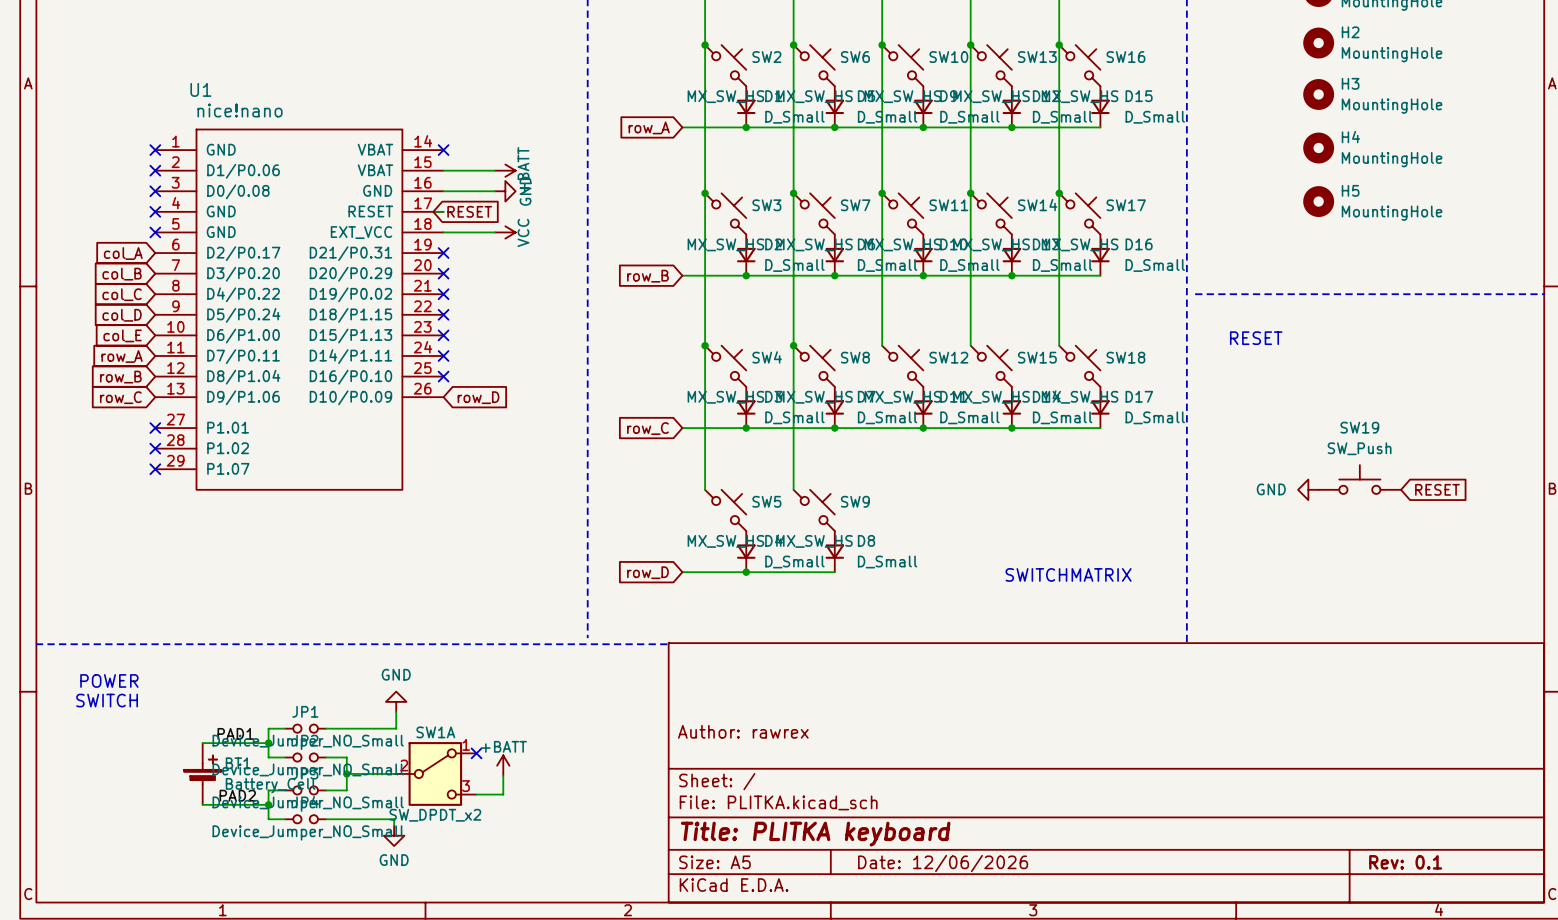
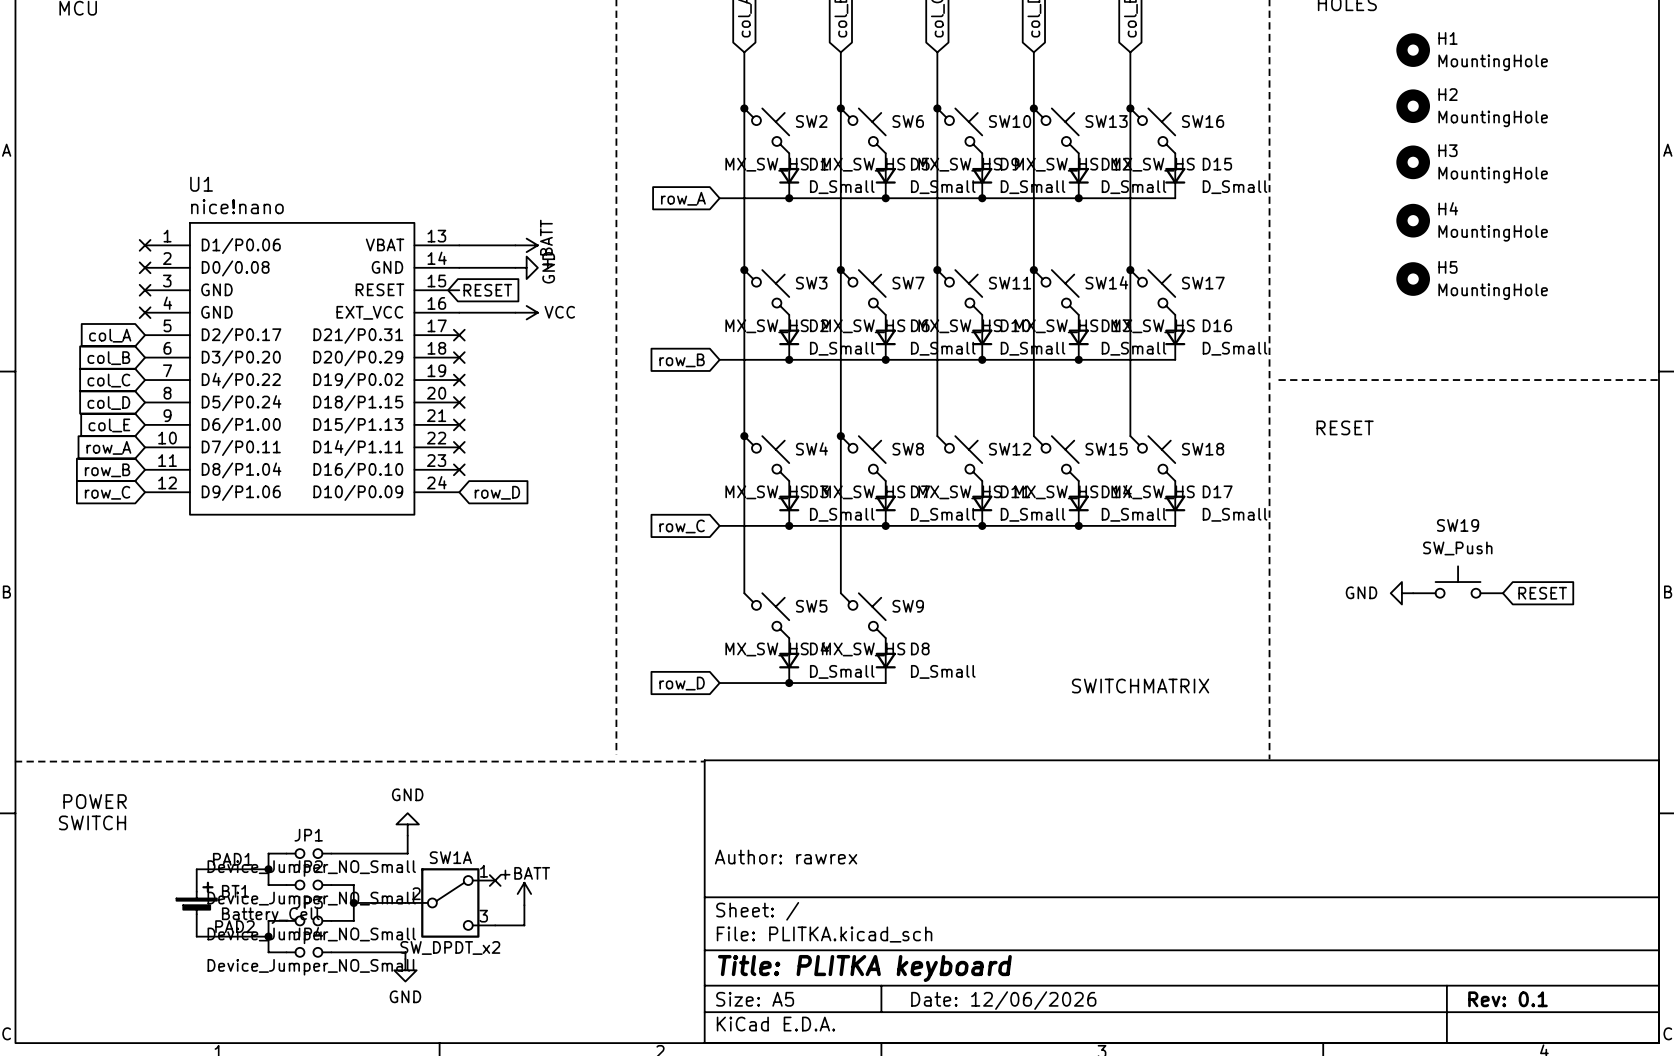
U1 name position: U1 (200, 89) -> U1 (201, 184)
U1 value position: nice!nano (240, 110) -> nice!nano (237, 206)
U1 symbol: [155, 129, 444, 490] -> [145, 222, 460, 515]
no-connect mark: (155, 150) -> none
no-connect mark: (443, 150) -> none
power symbol text rotation: 0° (523, 232) -> 90° clockwise (559, 312)
no-connect mark: (155, 428) -> none
no-connect mark: (155, 448) -> none
no-connect mark: (155, 469) -> none

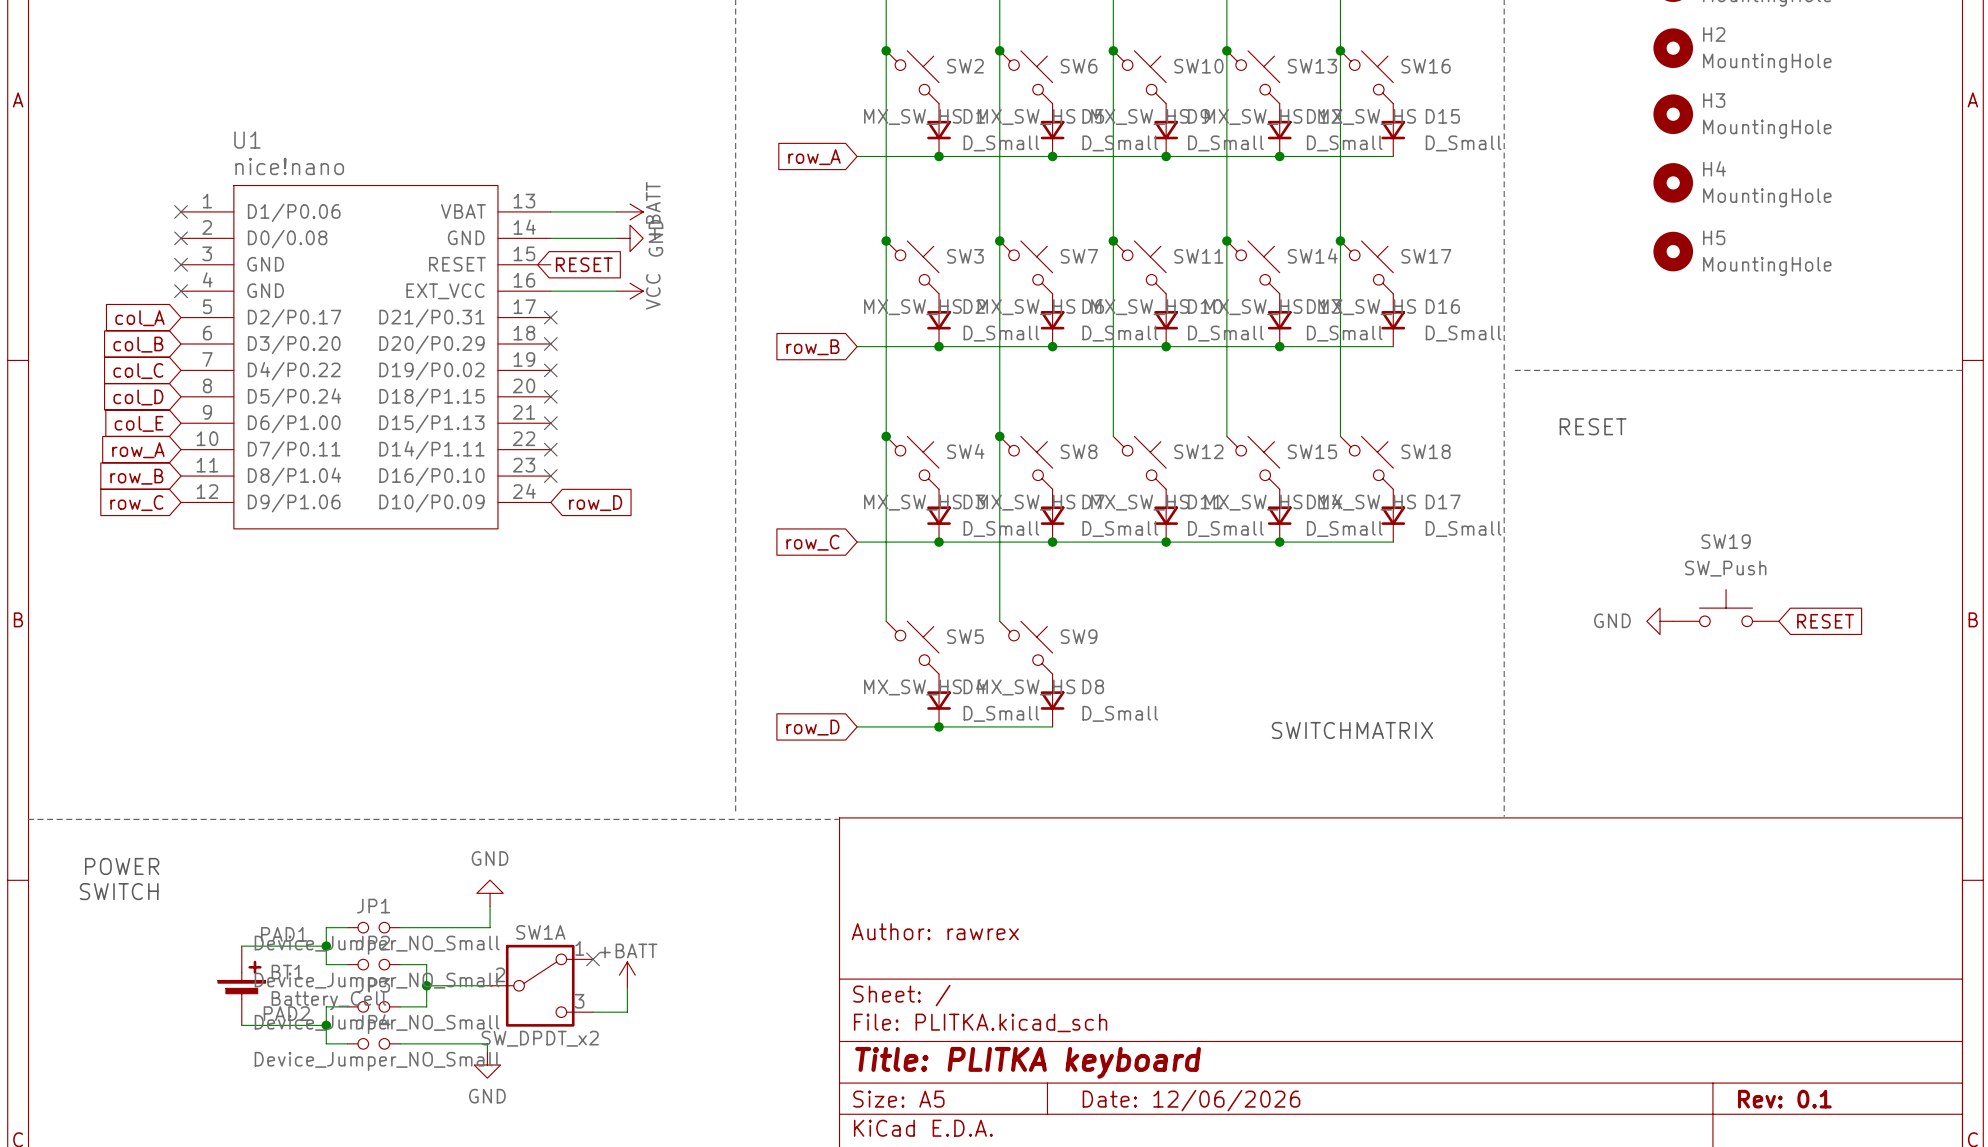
power symbol text rotation: 0° (559, 312) -> 90° counterclockwise (653, 291)

